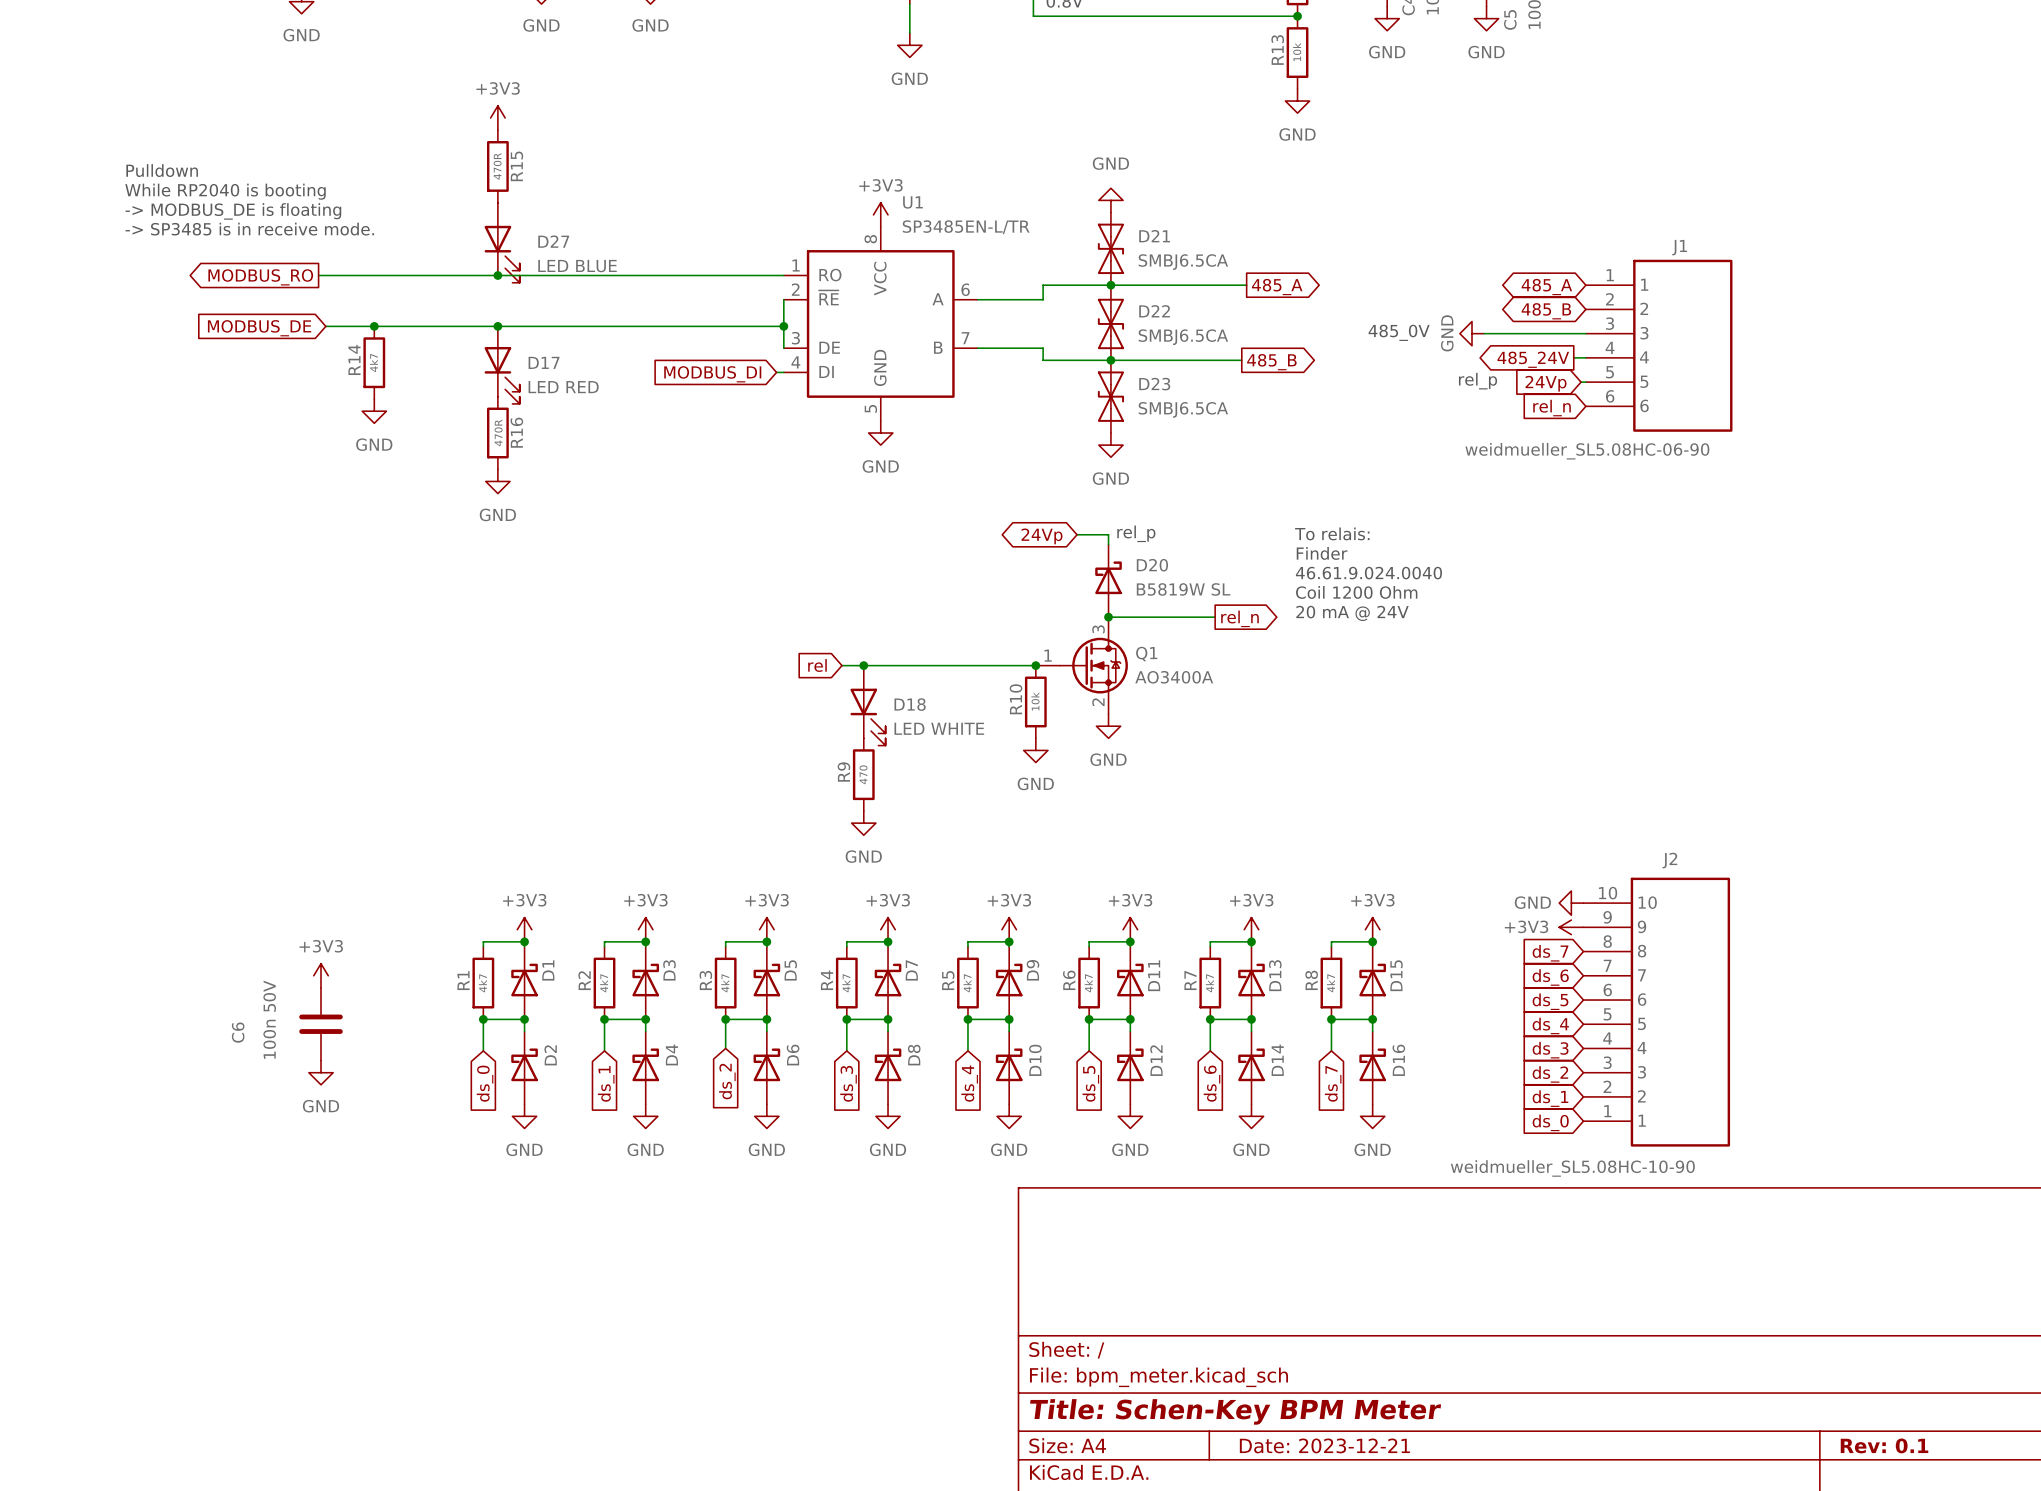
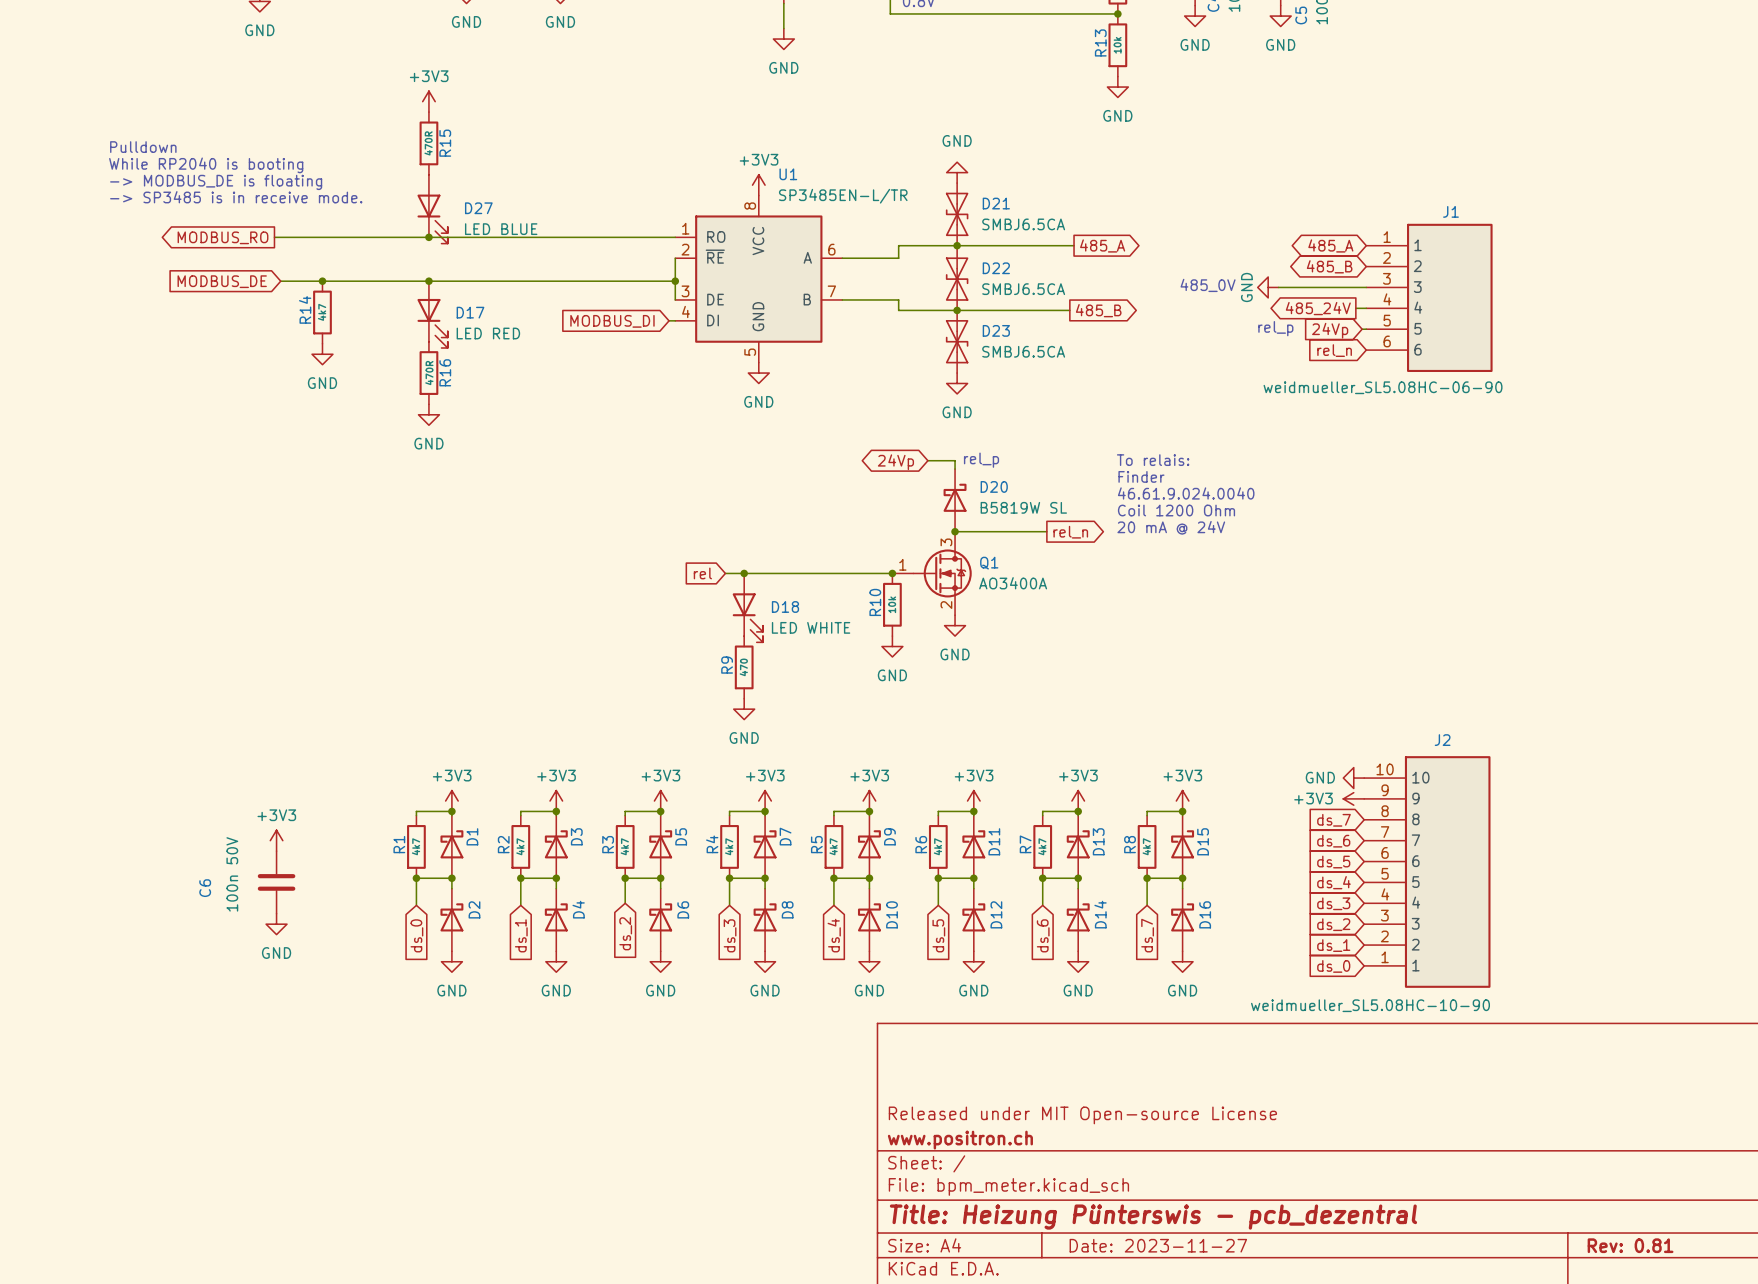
title block: none -> Released under MIT Open-source License (1082, 1115)
title block: none -> www.positron.ch (960, 1140)
title block: Title: Schen-Key BPM Meter (1235, 1411) -> Title: Heizung Pünterswis - pcb_dezentral (1153, 1217)
title block: Date: 2023-12-21 (1324, 1445) -> Date: 2023-11-27 (1158, 1245)
title block: Rev: 0.1 (1884, 1445) -> Rev: 0.81 (1630, 1245)

